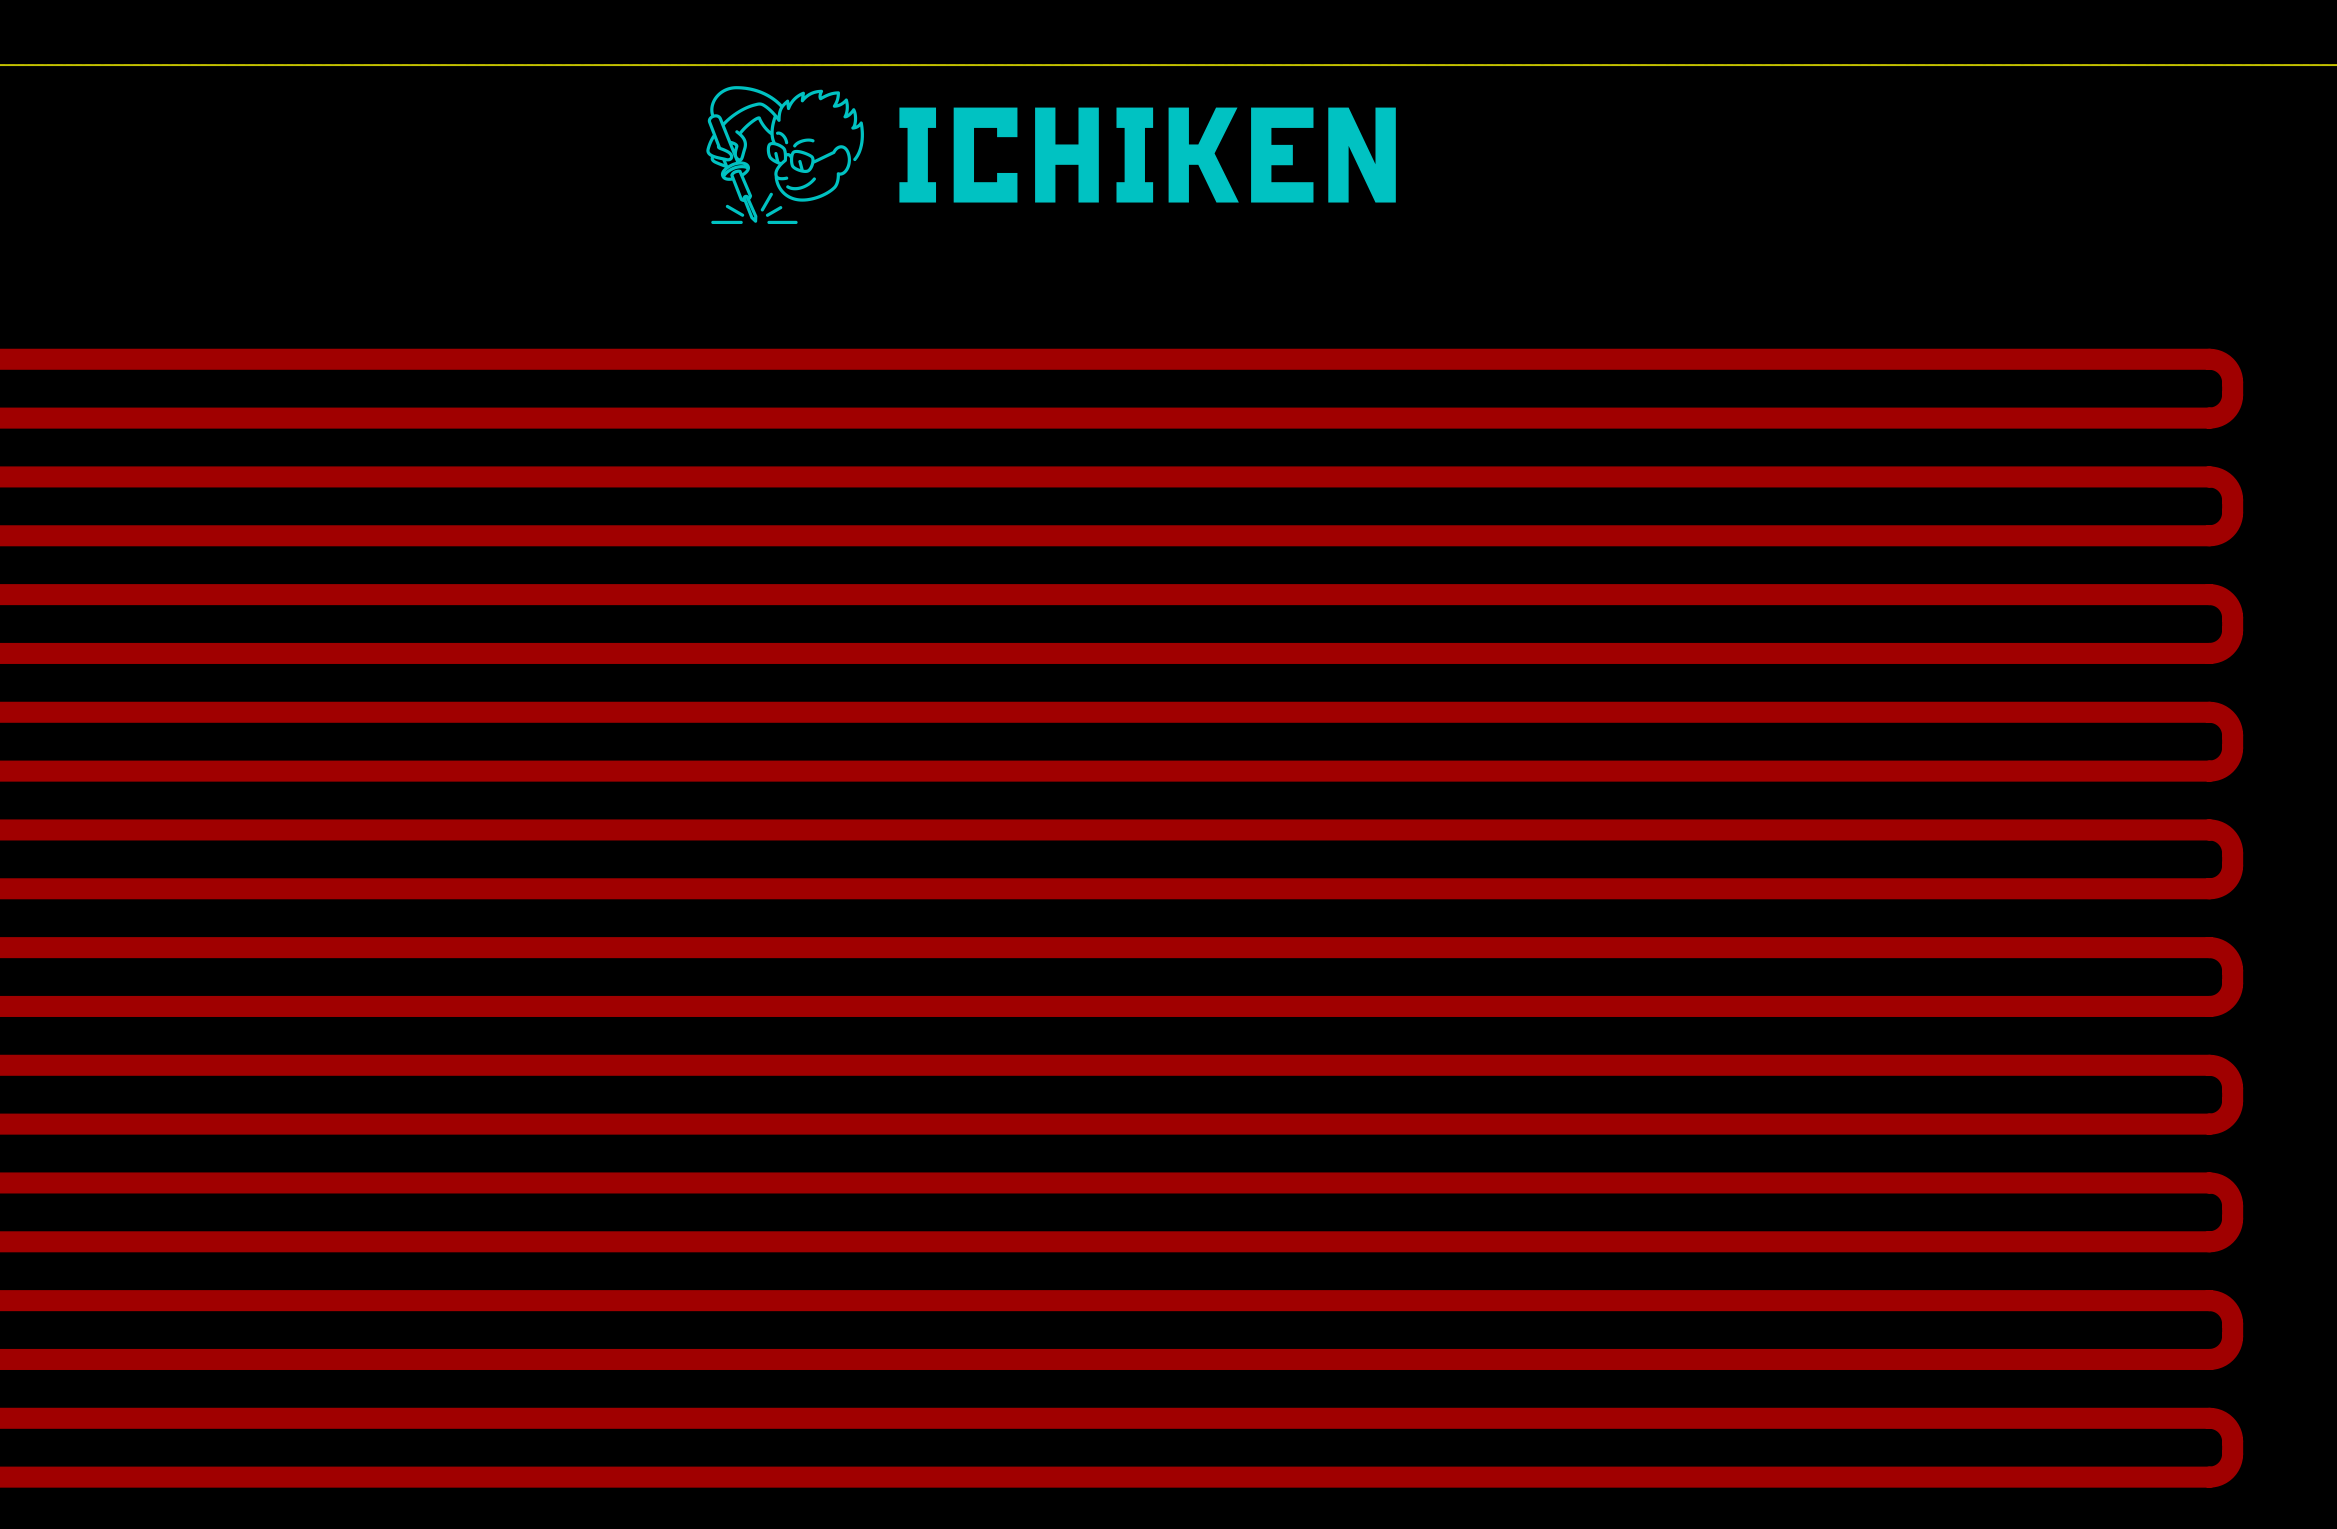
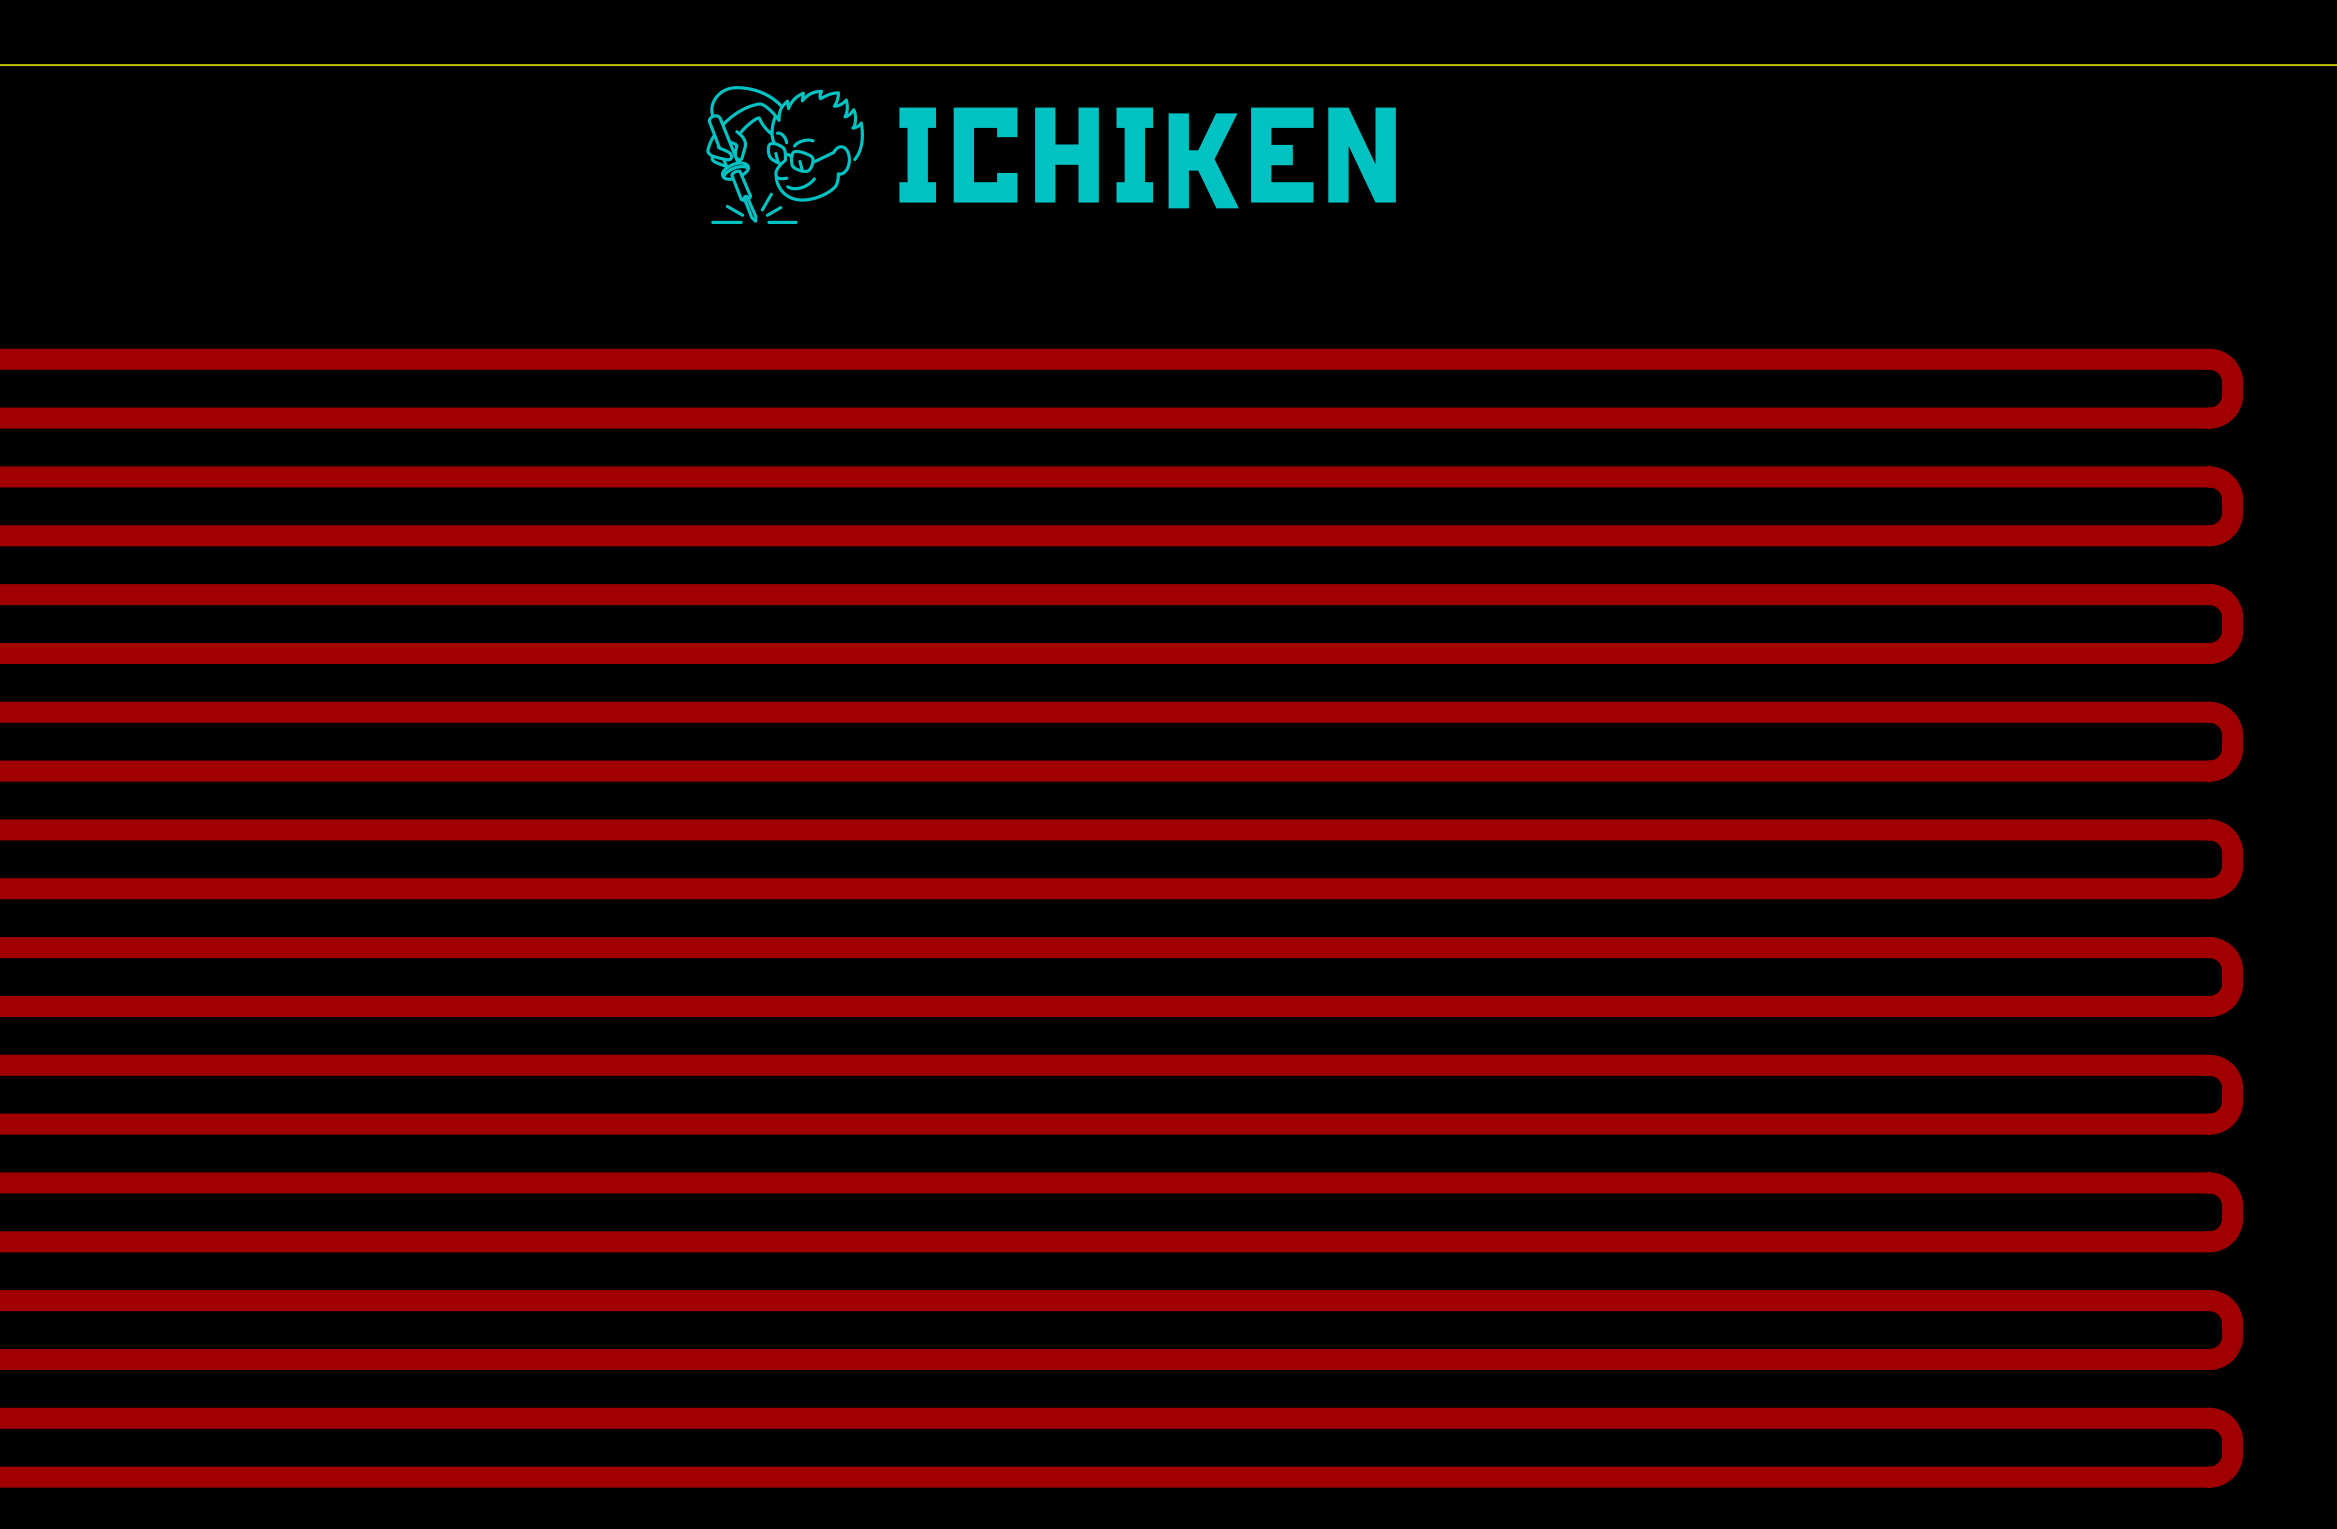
drawing shape: [1168, 107, 1239, 203] -> [1168, 113, 1239, 209]

